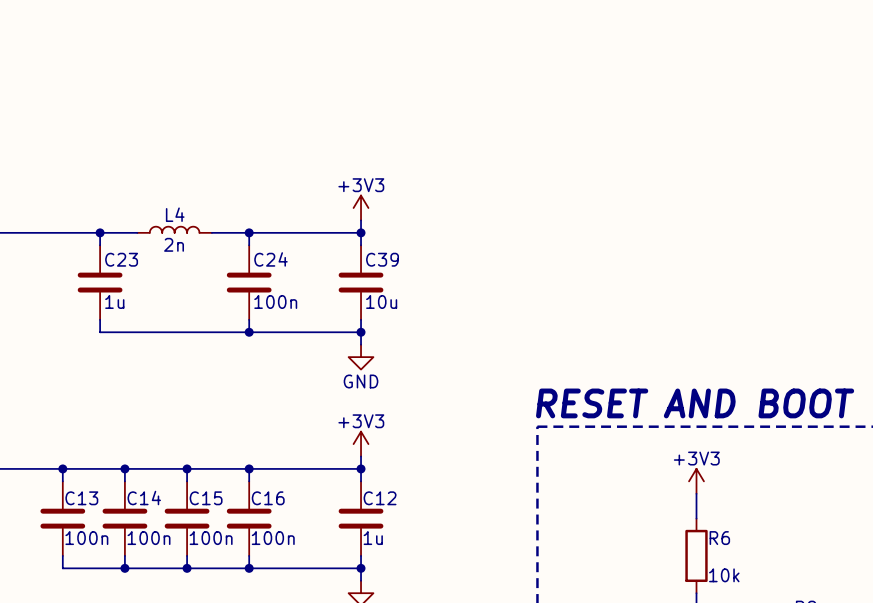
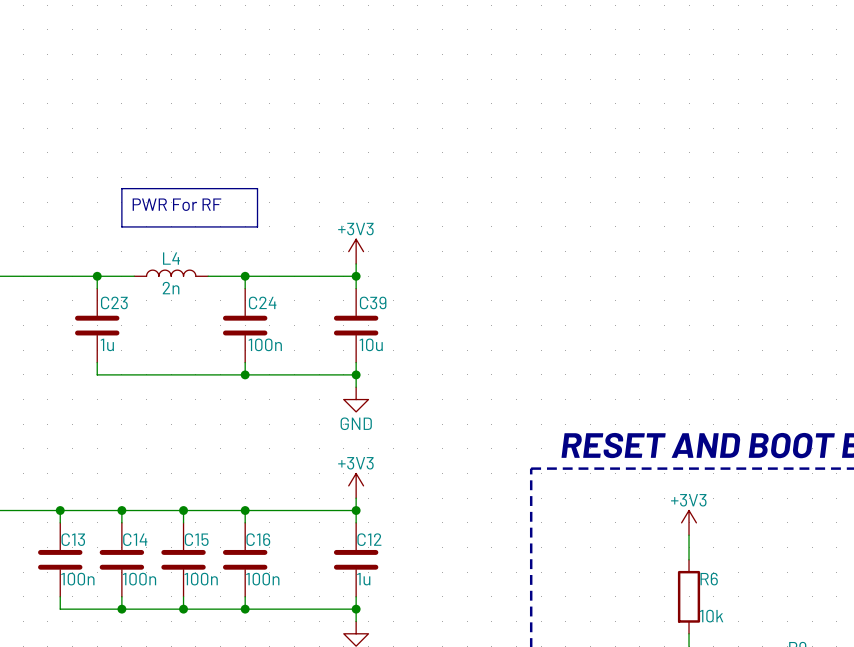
line: none -> (121, 188) (257, 188) (257, 226) (121, 226) (121, 188)
text: none -> PWR For RF (176, 204)

